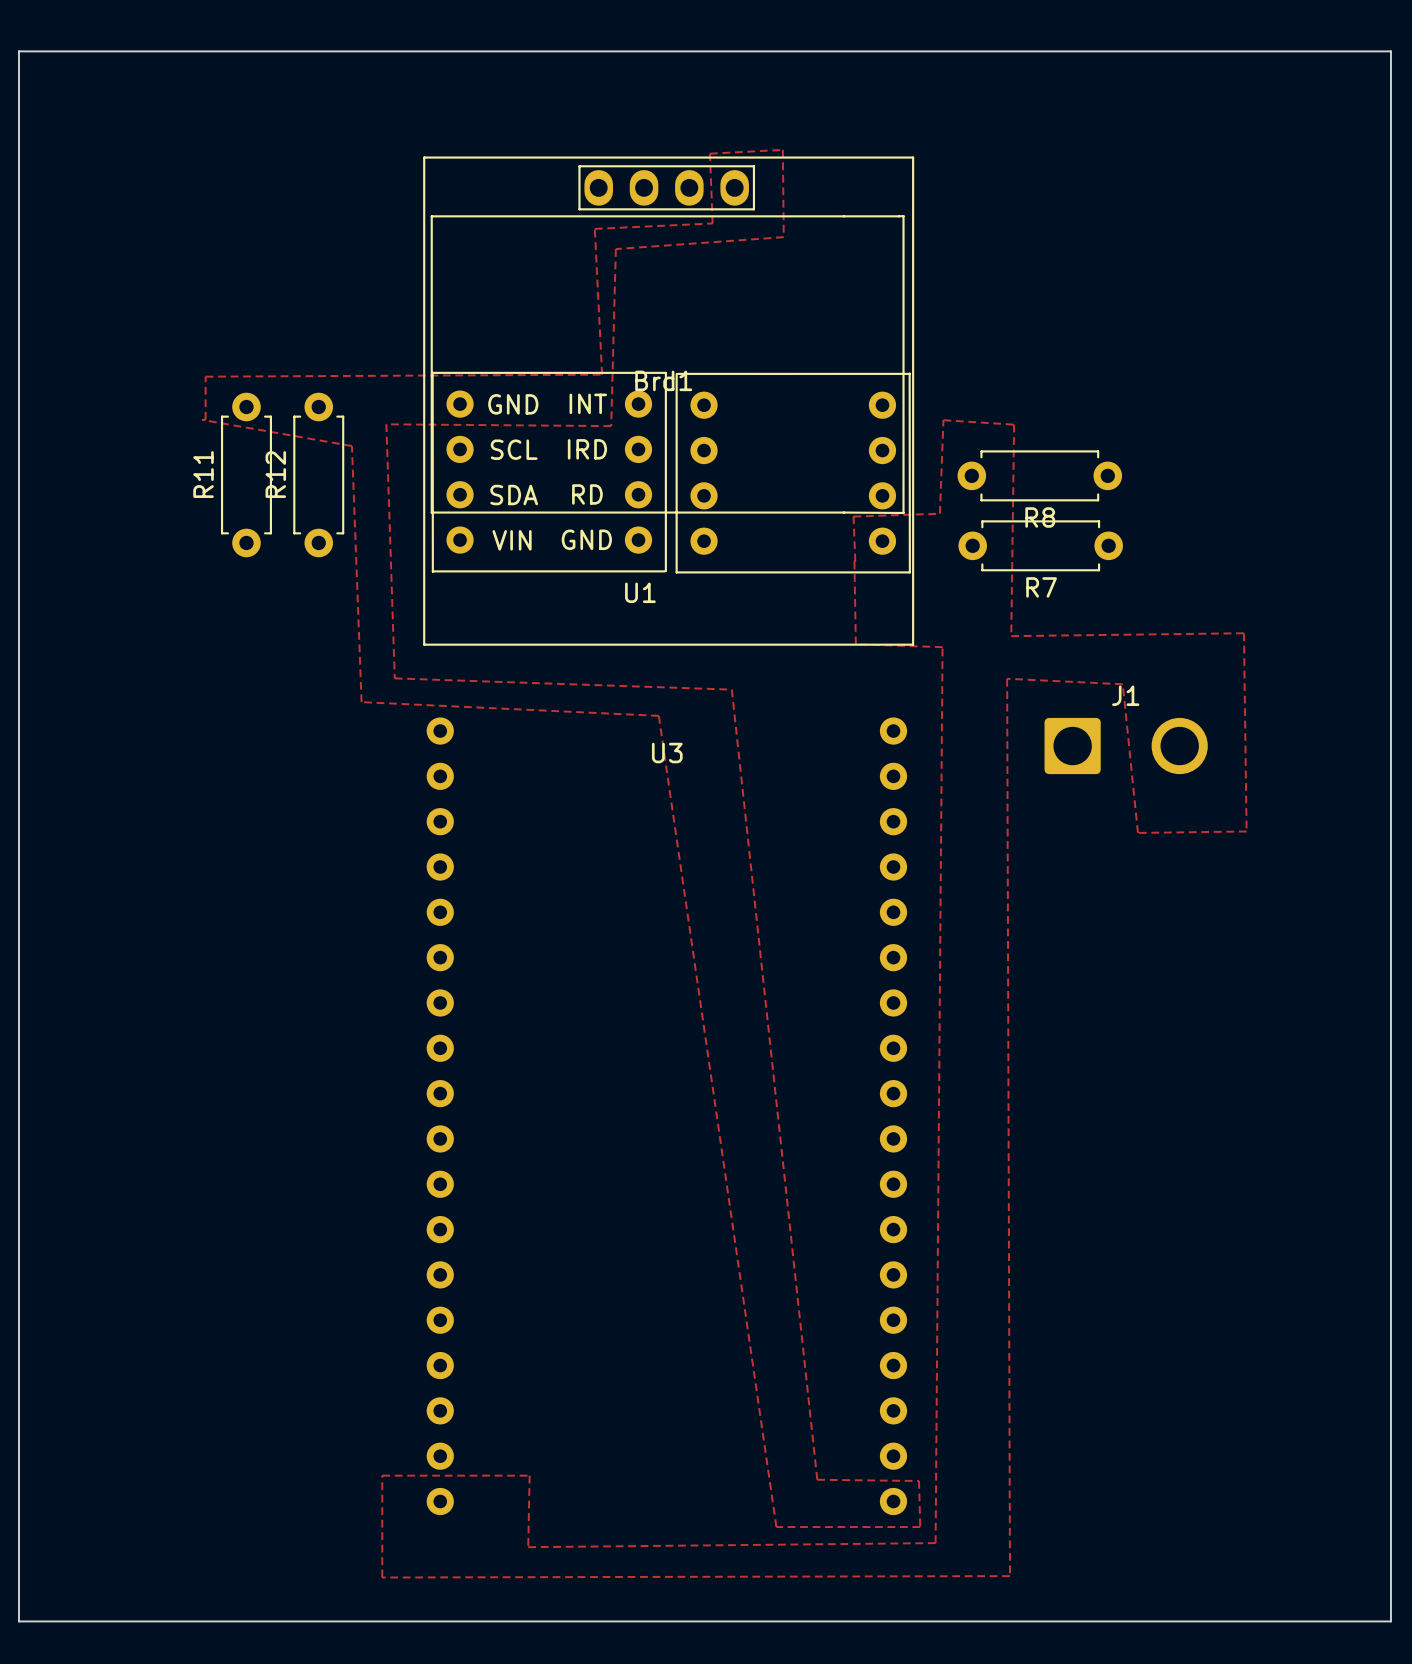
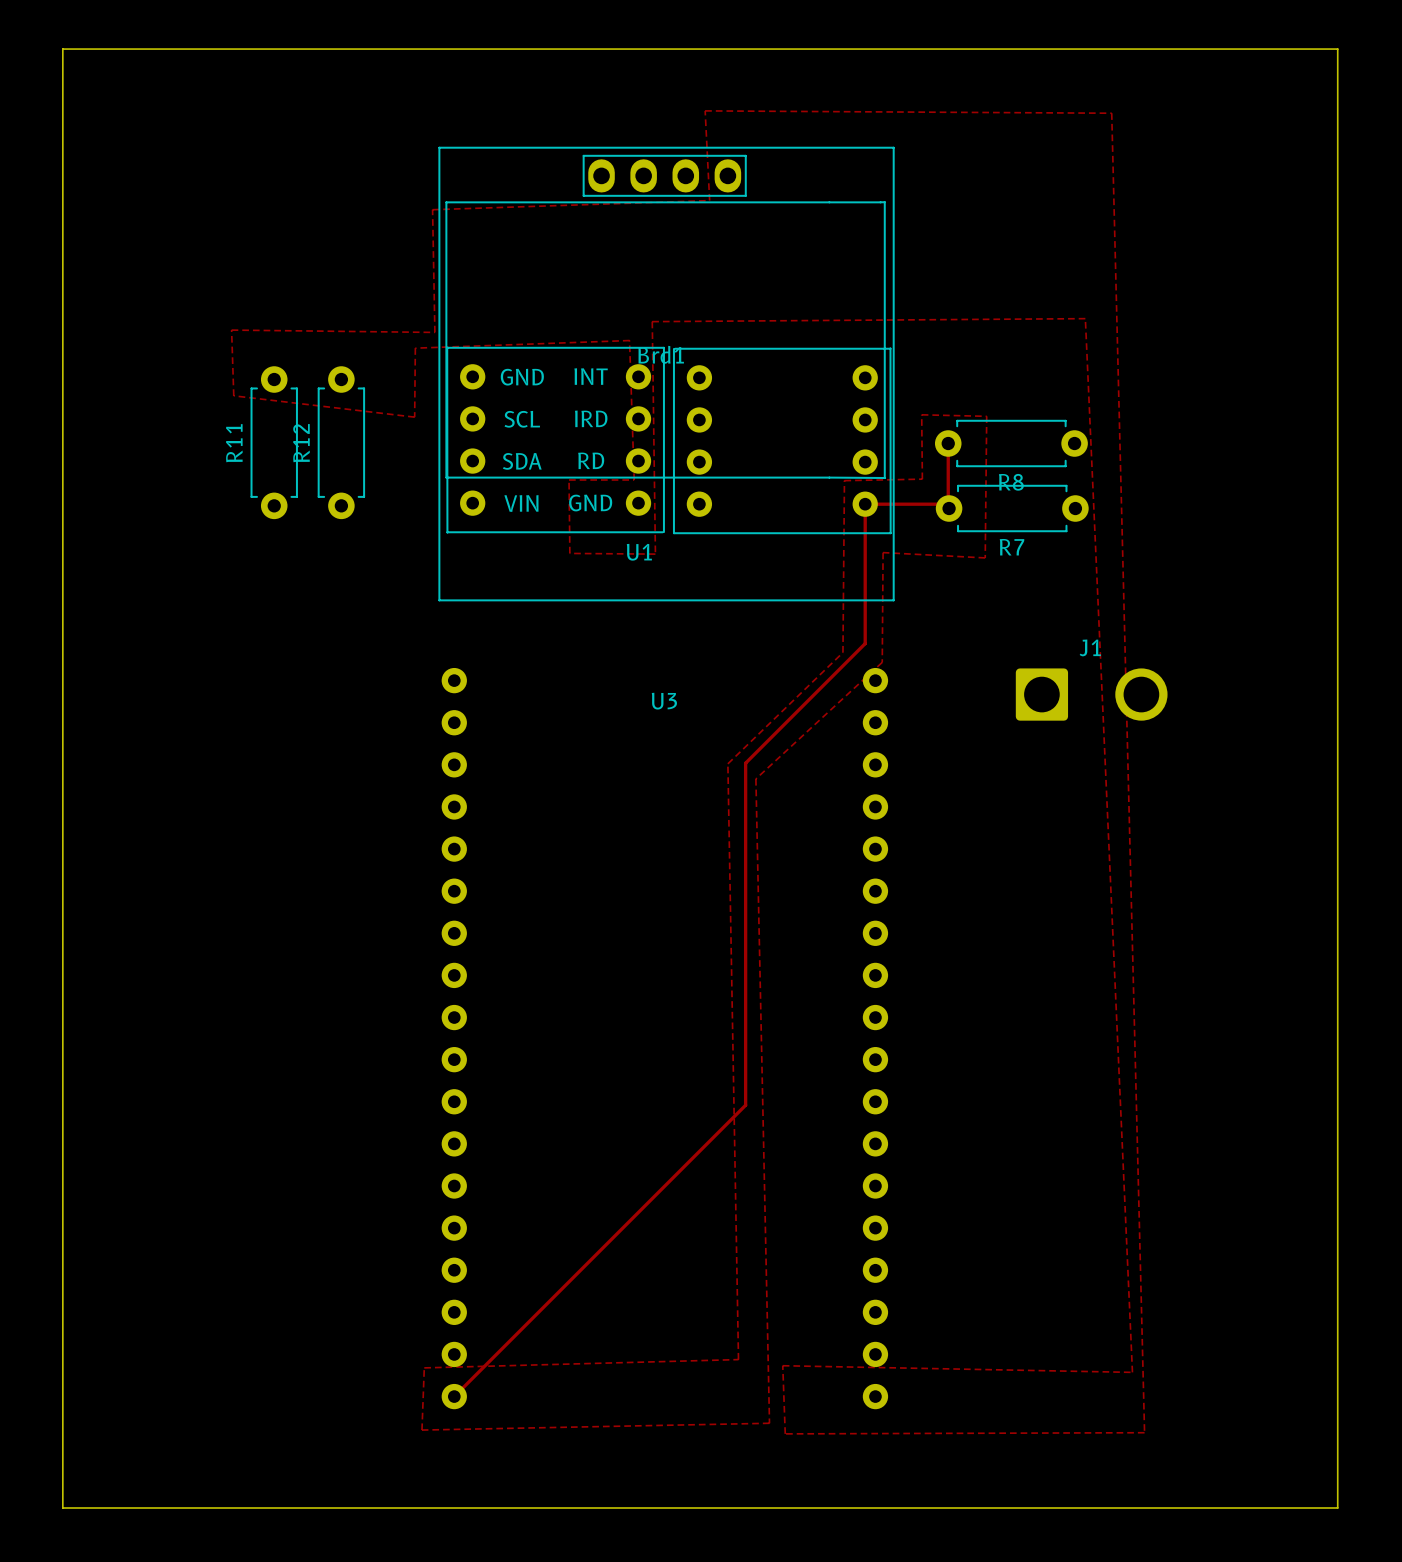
zone outline: (782, 149) (709, 153) (712, 223) (594, 228) (602, 374) (205, 376) (205, 419) (202, 419) (351, 446) (361, 702) (658, 715) (776, 1527) (920, 1527) (919, 1480) (817, 1479) (731, 689) (394, 678) (386, 424) (611, 426) (615, 249) (783, 237) (782, 149) -> (705, 110) (709, 200) (432, 209) (434, 332) (231, 330) (233, 395) (414, 417) (415, 348) (629, 340) (634, 479) (569, 479) (569, 553) (655, 554) (652, 321) (1085, 318) (1132, 1372) (782, 1365) (785, 1433) (1144, 1432) (1111, 113) (705, 110)
zone outline: (943, 420) (939, 513) (853, 516) (855, 644) (942, 647) (935, 1543) (528, 1547) (529, 1475) (382, 1475) (382, 1577) (1010, 1576) (1007, 678) (1122, 684) (1137, 832) (1246, 831) (1243, 633) (1011, 636) (1014, 424) (943, 420) -> (921, 414) (922, 479) (844, 480) (842, 652) (727, 763) (738, 1359) (424, 1367) (421, 1430) (769, 1423) (755, 778) (882, 662) (883, 552) (985, 557) (986, 416) (921, 414)
track: none -> (948, 443) (948, 505)
track: none -> (944, 504) (865, 504) (865, 643) (745, 763) (745, 1105) (454, 1396)

